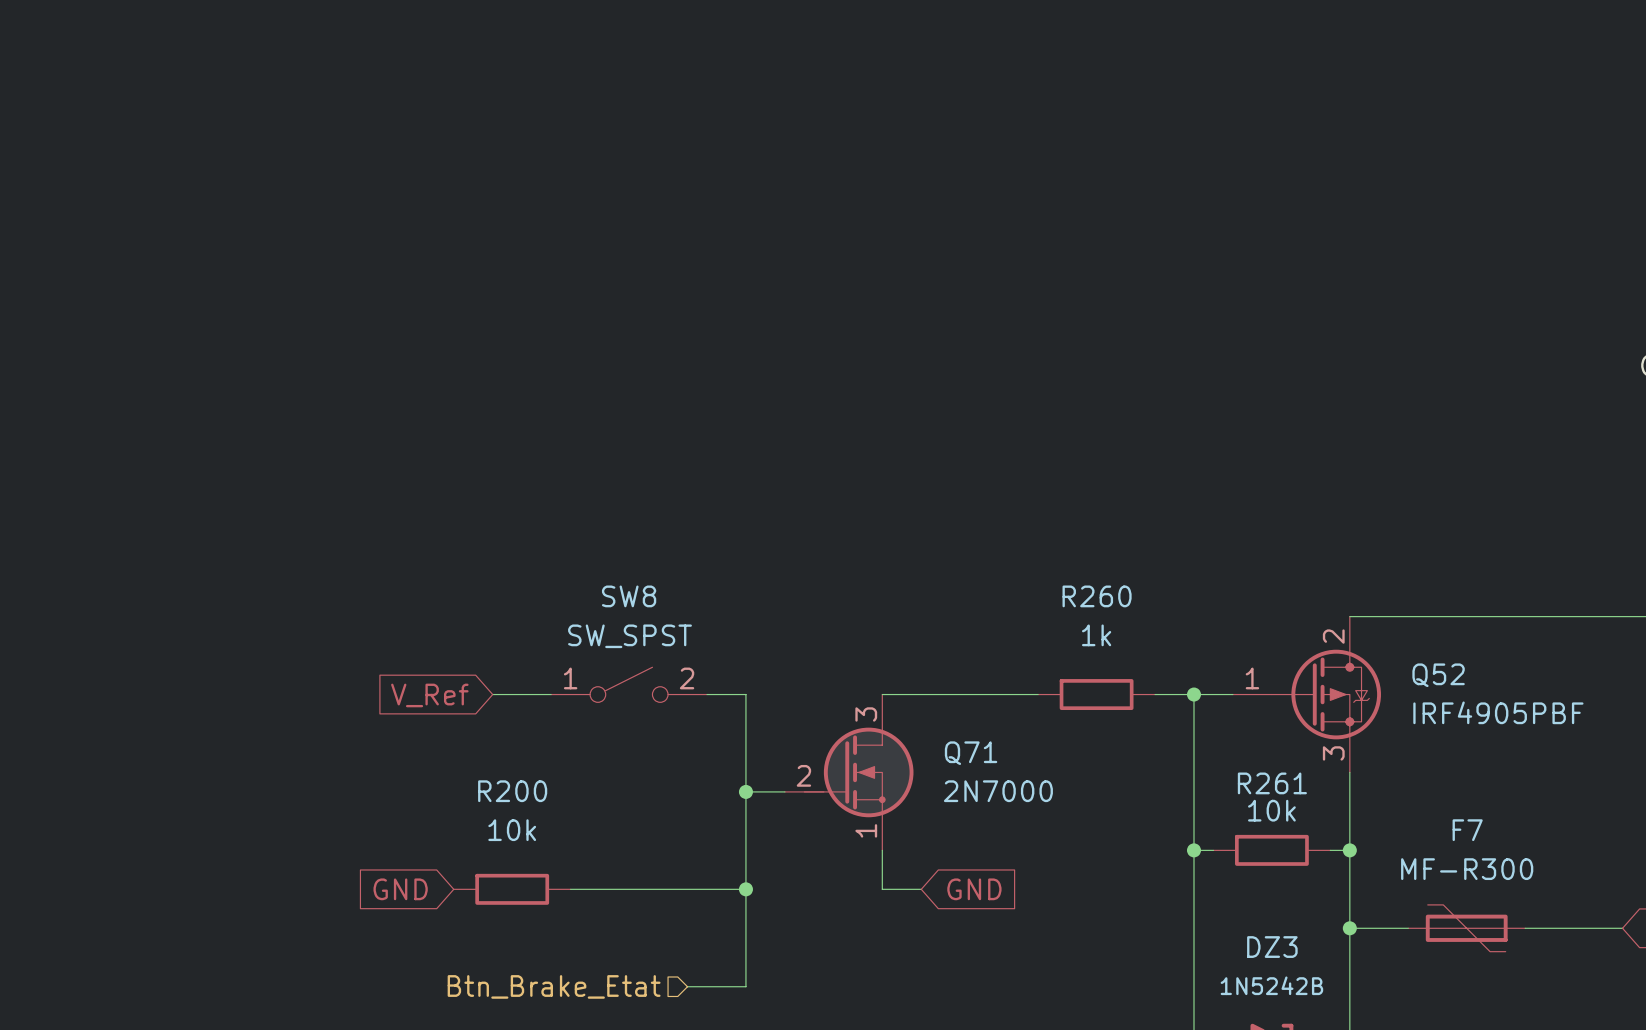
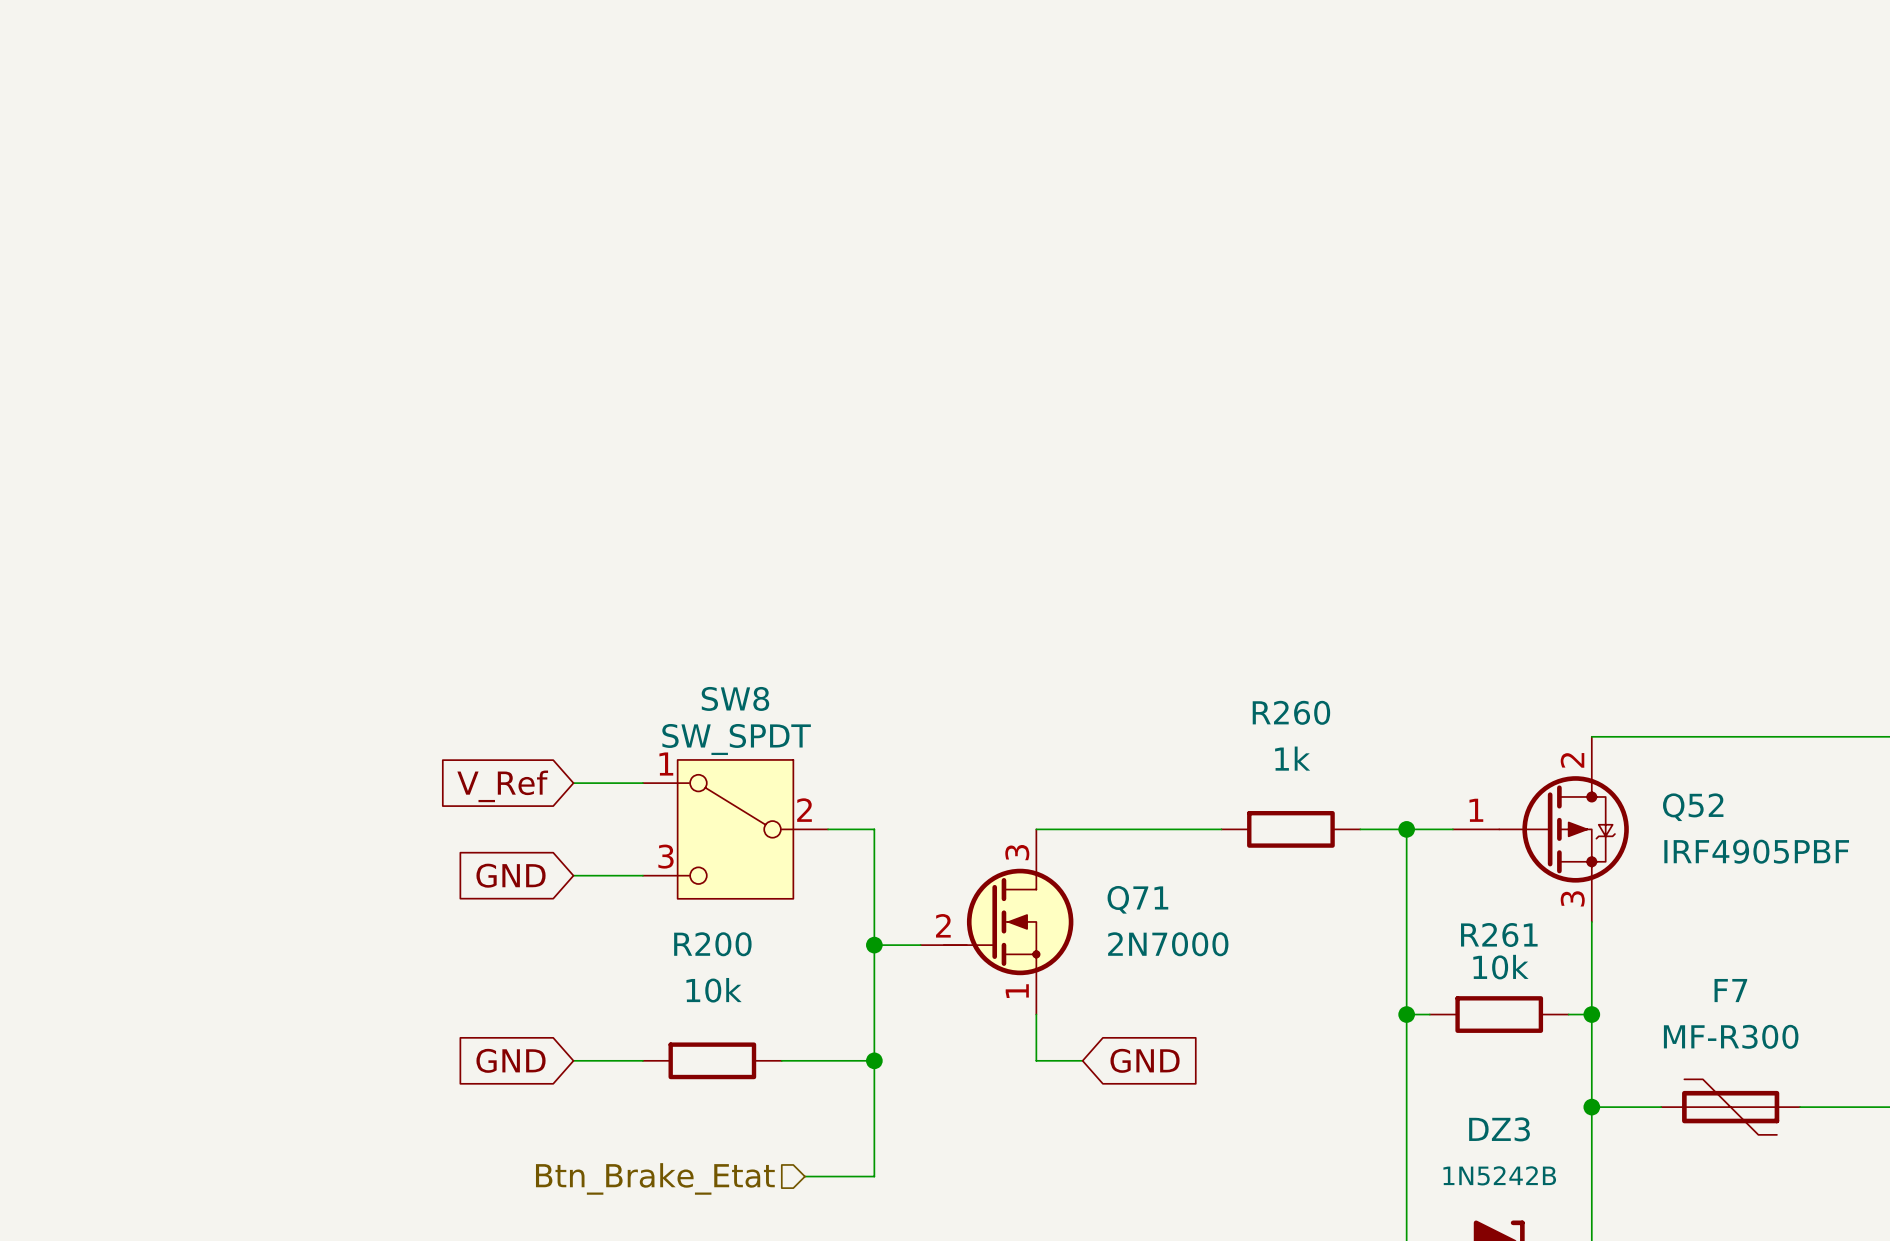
SW8 value: SW_SPST (630, 636) -> SW_SPDT (736, 739)
SW8 symbol: [551, 667, 708, 703] -> [642, 759, 829, 899]
wire: (492, 694) (551, 694) -> (573, 783) (642, 783)
global label position: V_Ref (429, 695) -> V_Ref (502, 786)
global label: none -> GND (511, 875)
wire: none -> (573, 875) (642, 875)
global label position: GND (400, 889) -> GND (511, 1060)
wire: none -> (573, 1060) (642, 1060)
R200 position: (512, 889) -> (712, 1060)
wire: (570, 889) (668, 889) -> none

